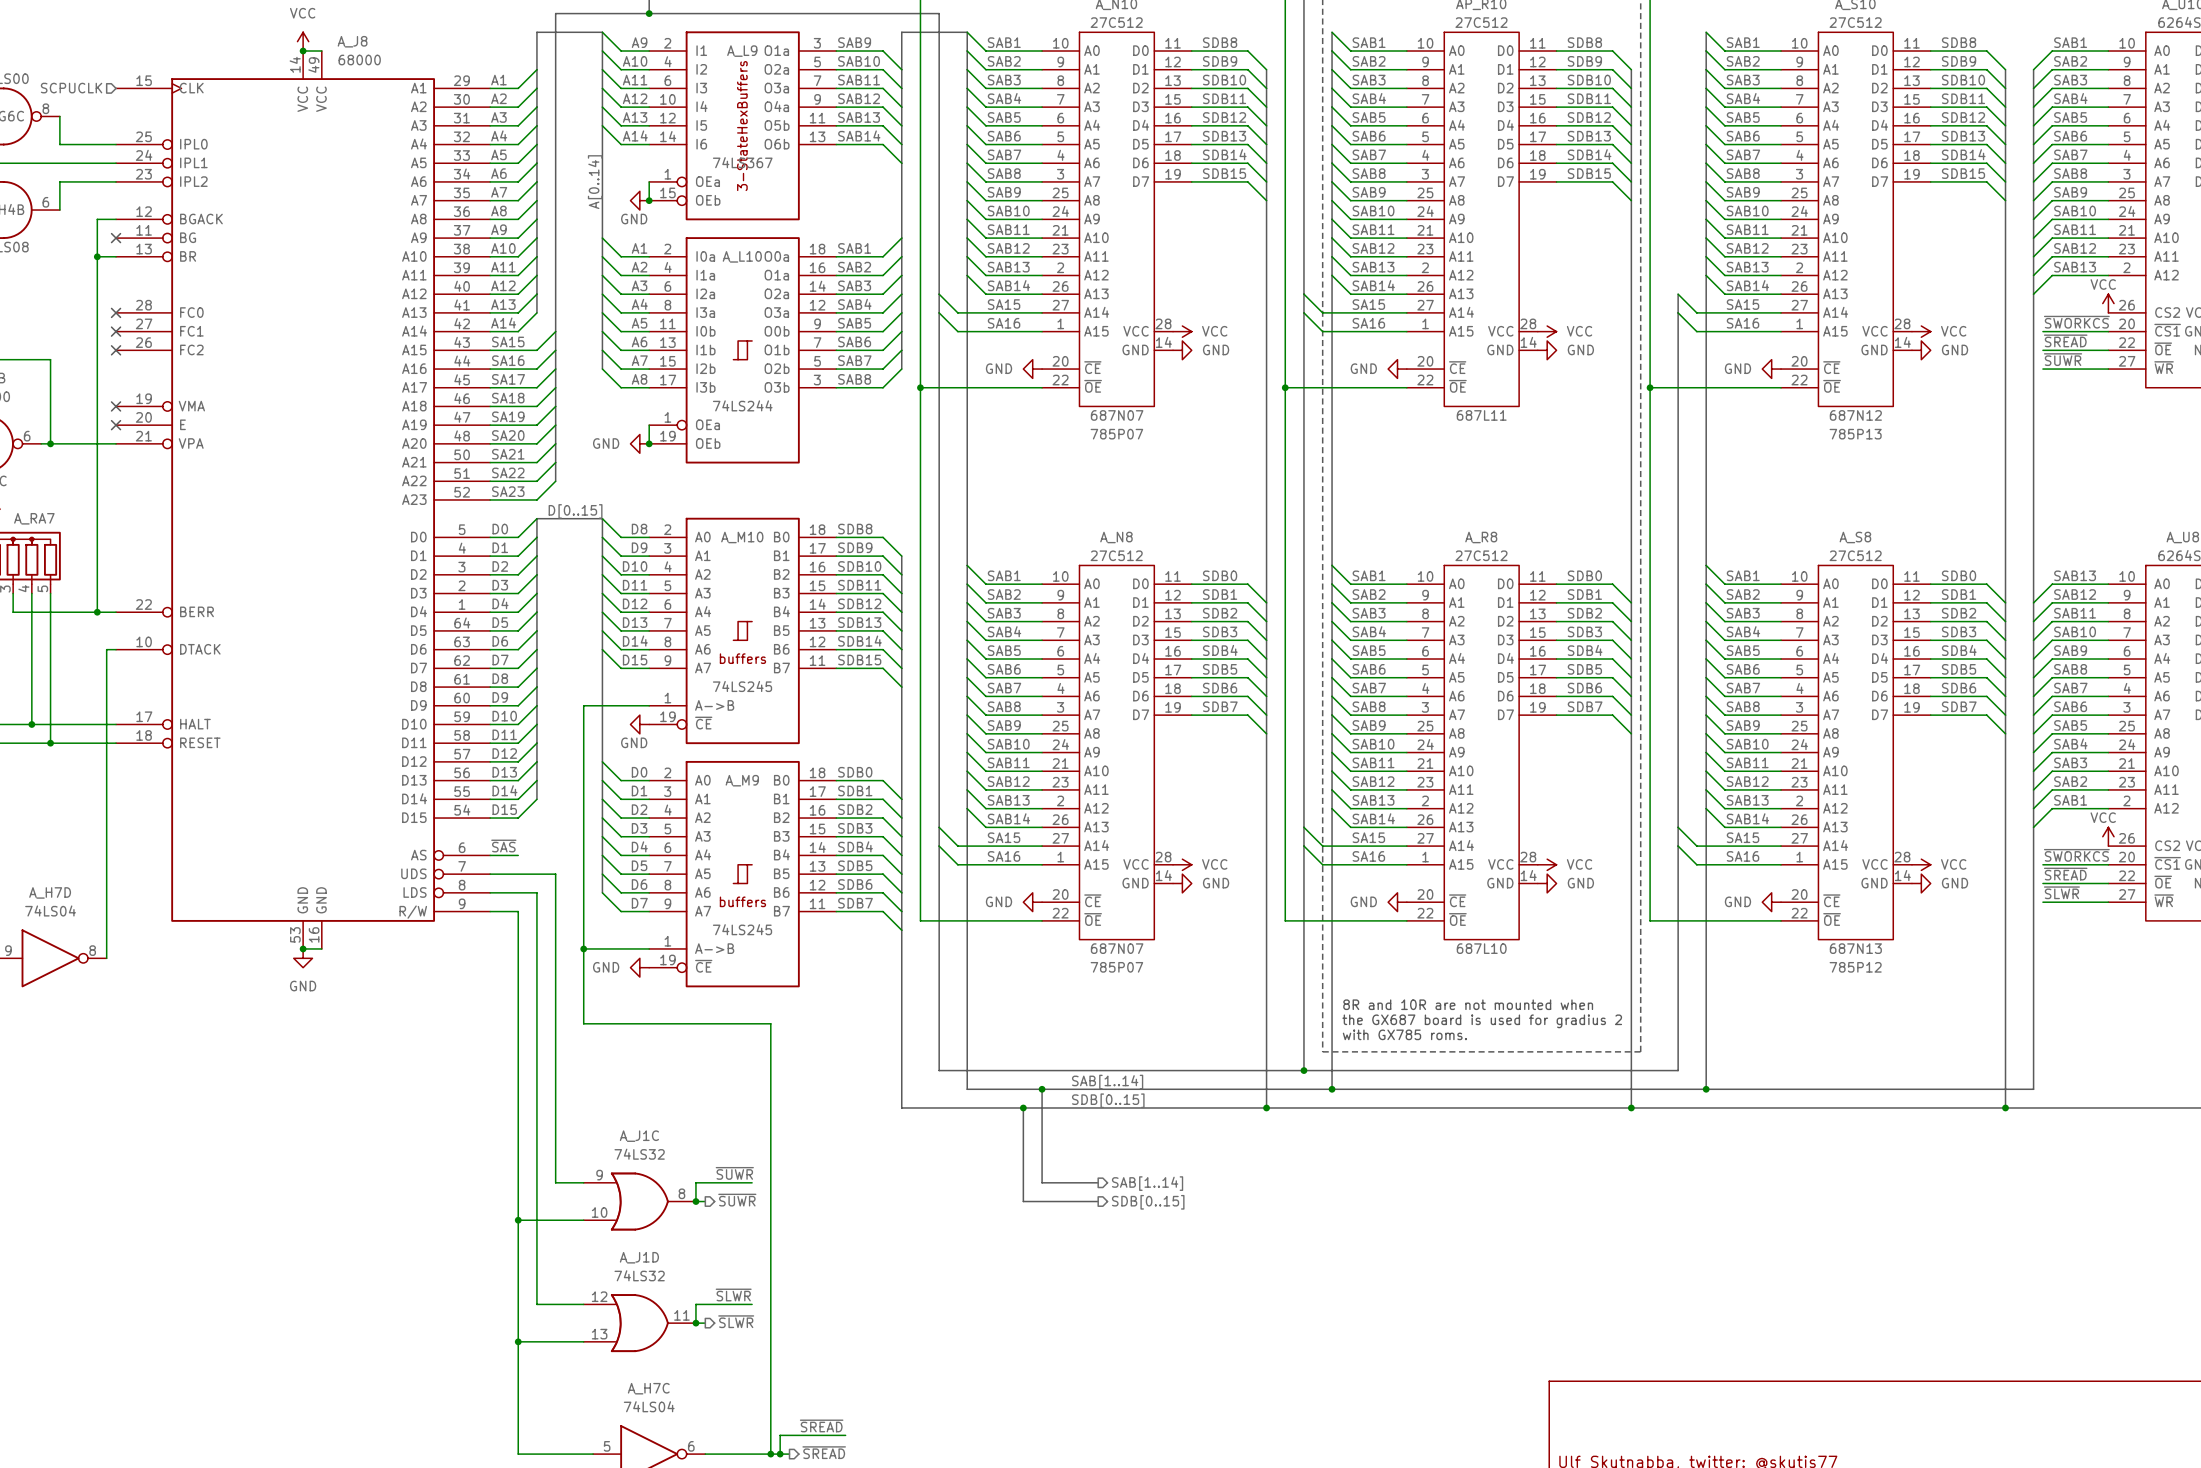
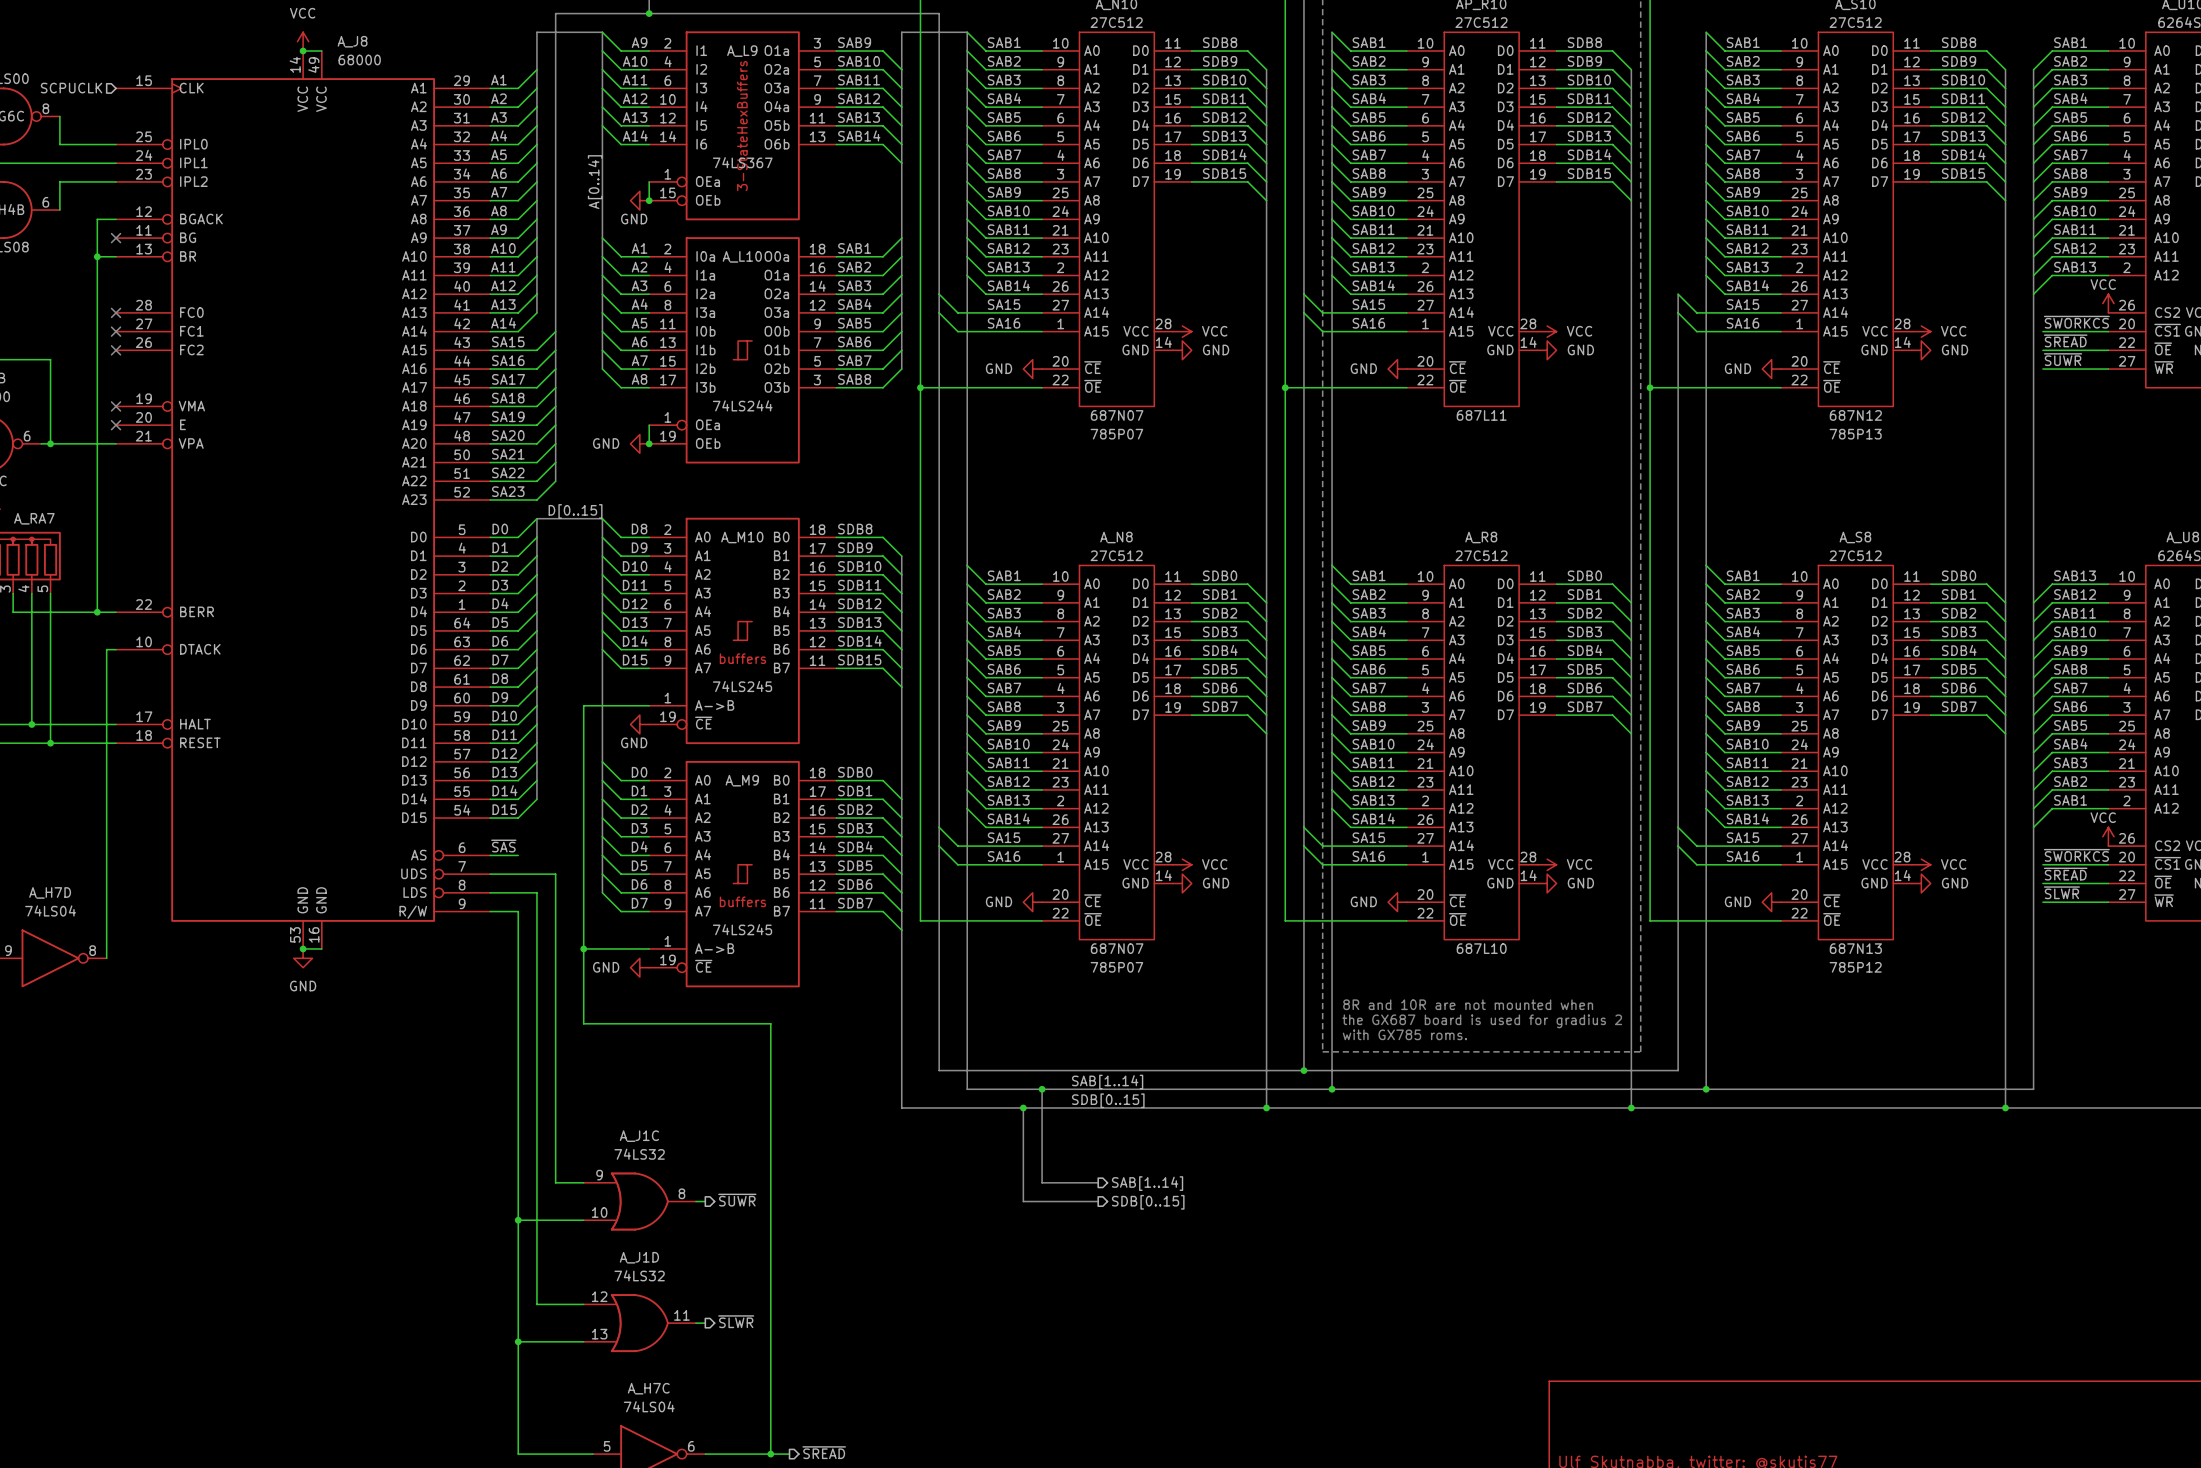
label: ~{SUWR} (734, 1173) -> none
wire: (752, 1182) (695, 1182) (695, 1201) -> none
junction: (695, 1201) -> none
label: ~{SLWR} (733, 1295) -> none
wire: (752, 1304) (695, 1304) (695, 1323) -> none
junction: (695, 1323) -> none
label: ~{SREAD} (821, 1425) -> none
wire: (845, 1435) (780, 1435) (780, 1454) -> none
junction: (780, 1454) -> none

